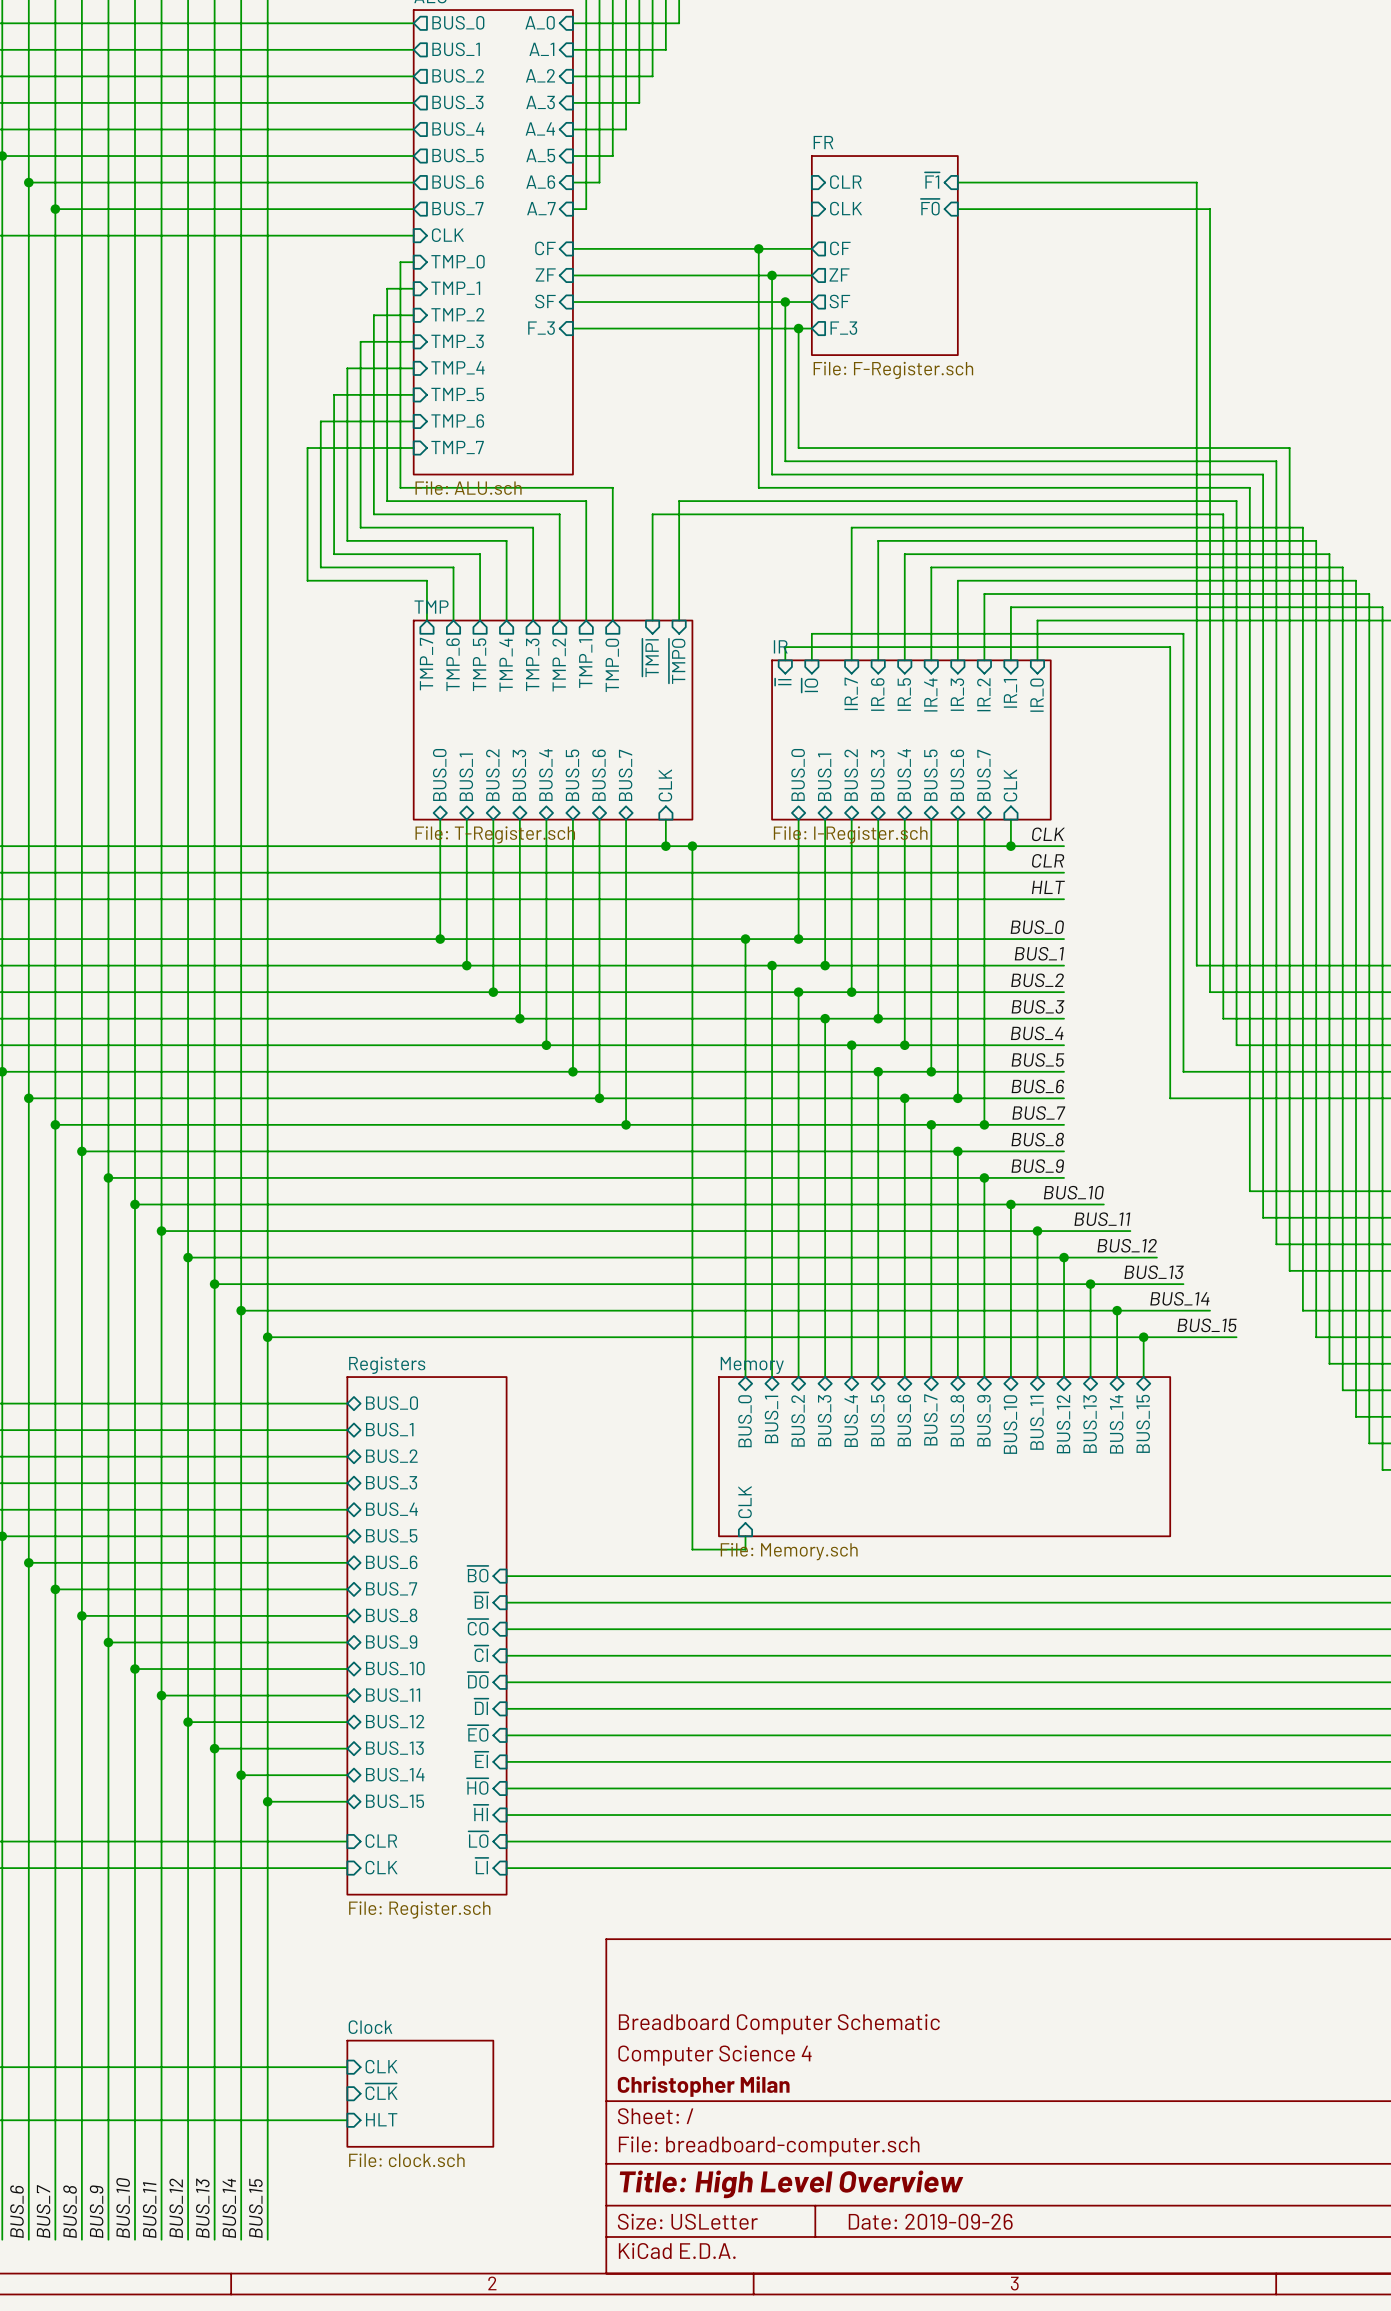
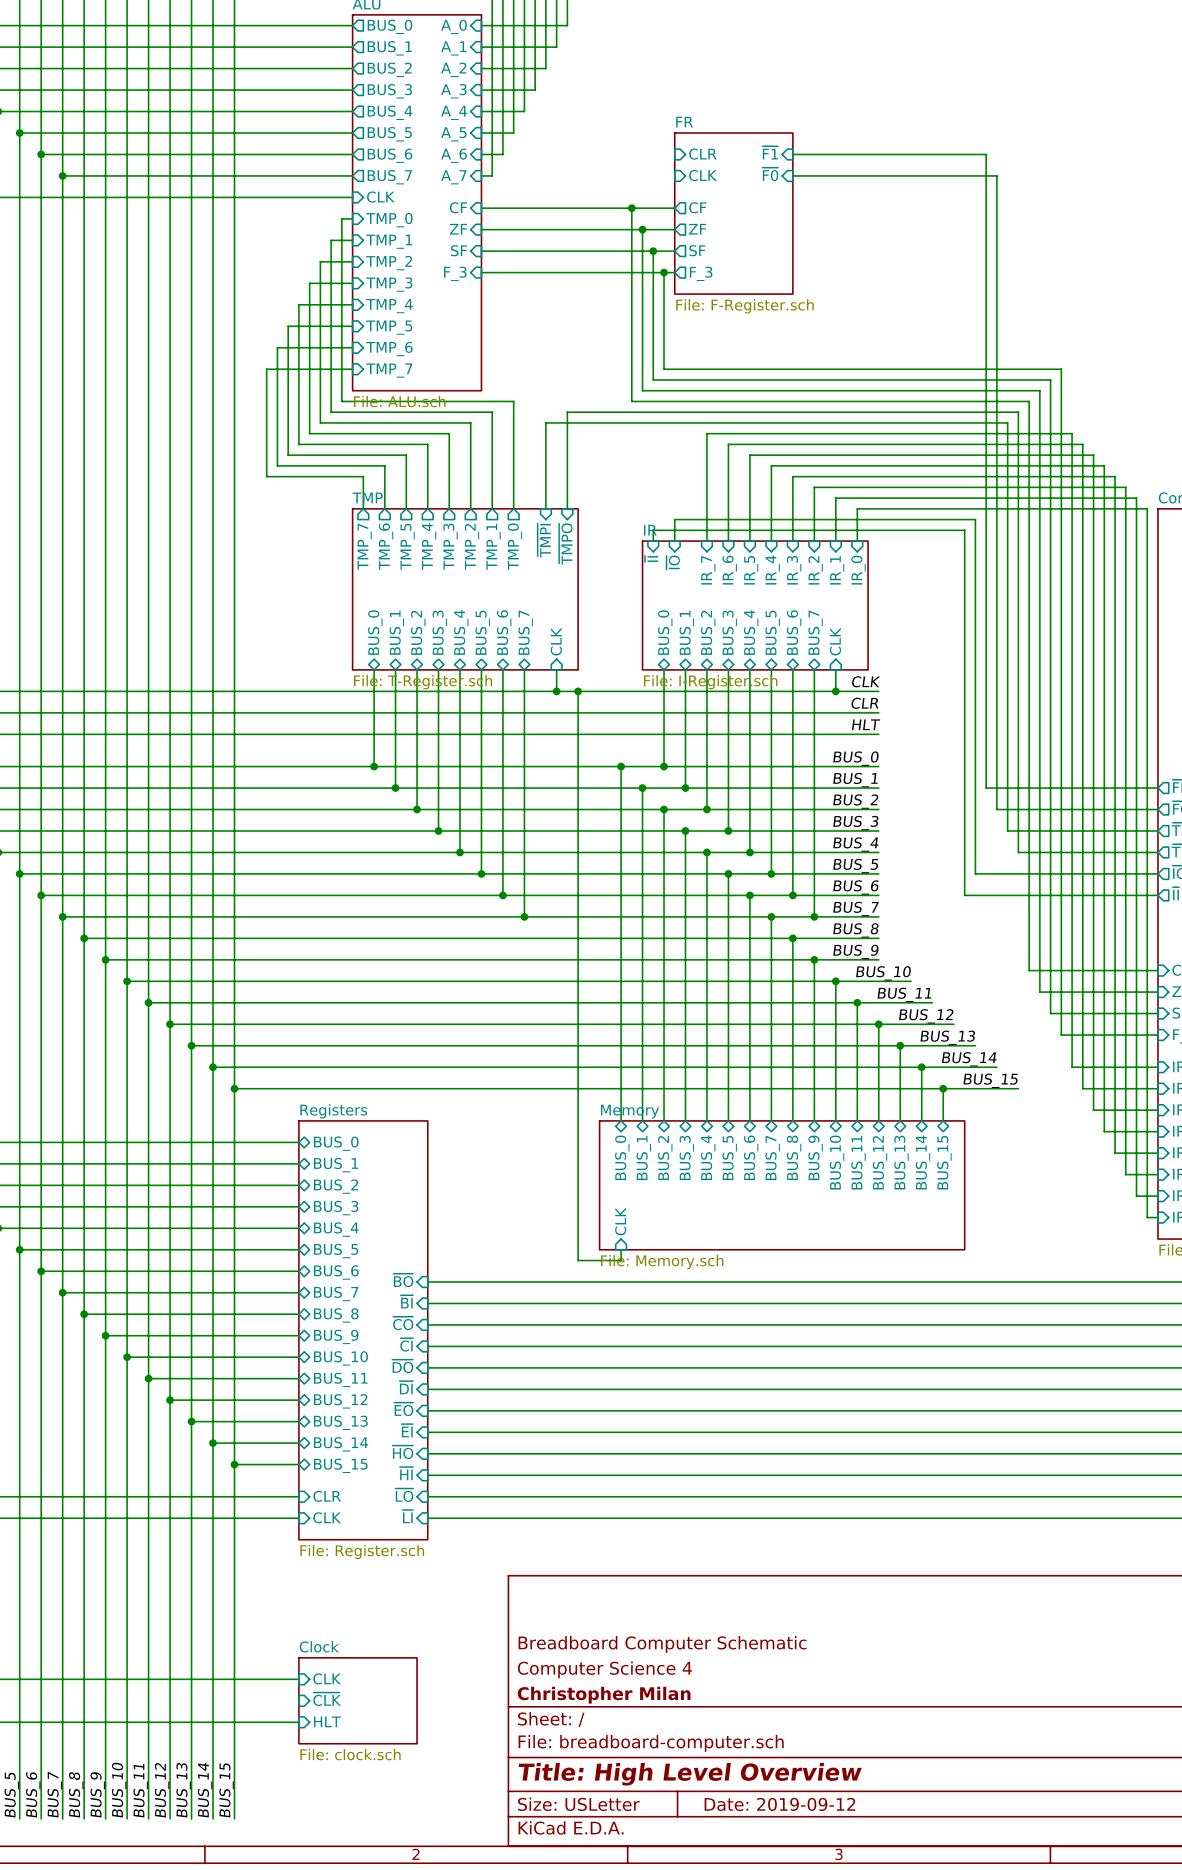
title block: Date: 2019-09-26 (930, 2221) -> Date: 2019-09-12 (779, 1804)

